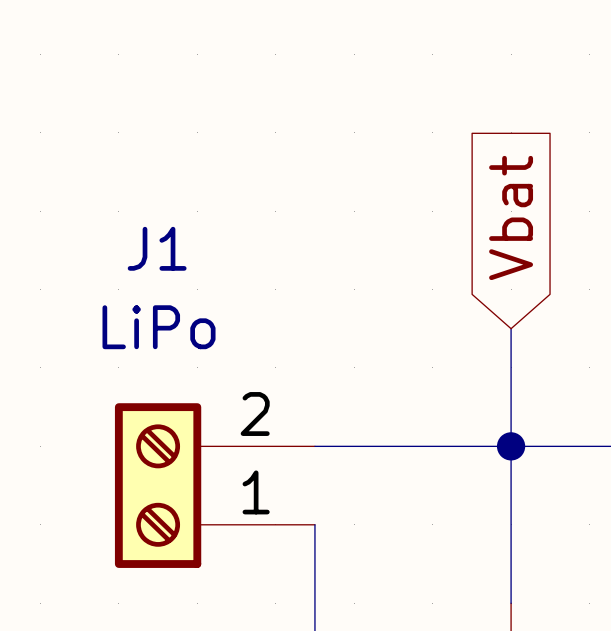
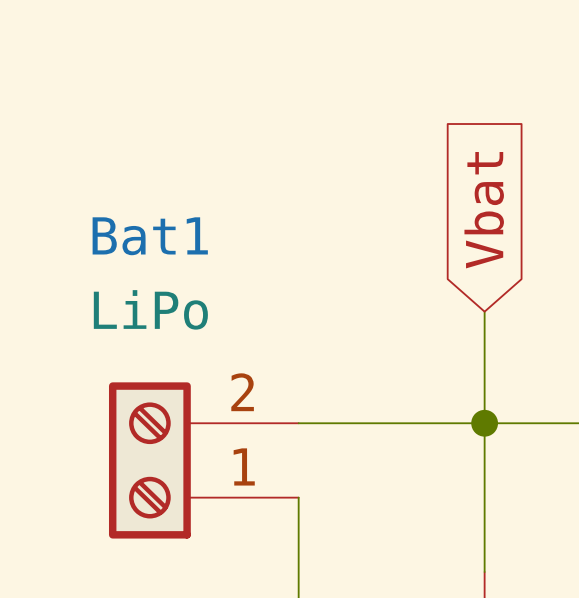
J1 name: J1 (157, 248) -> Bat1 (150, 236)

